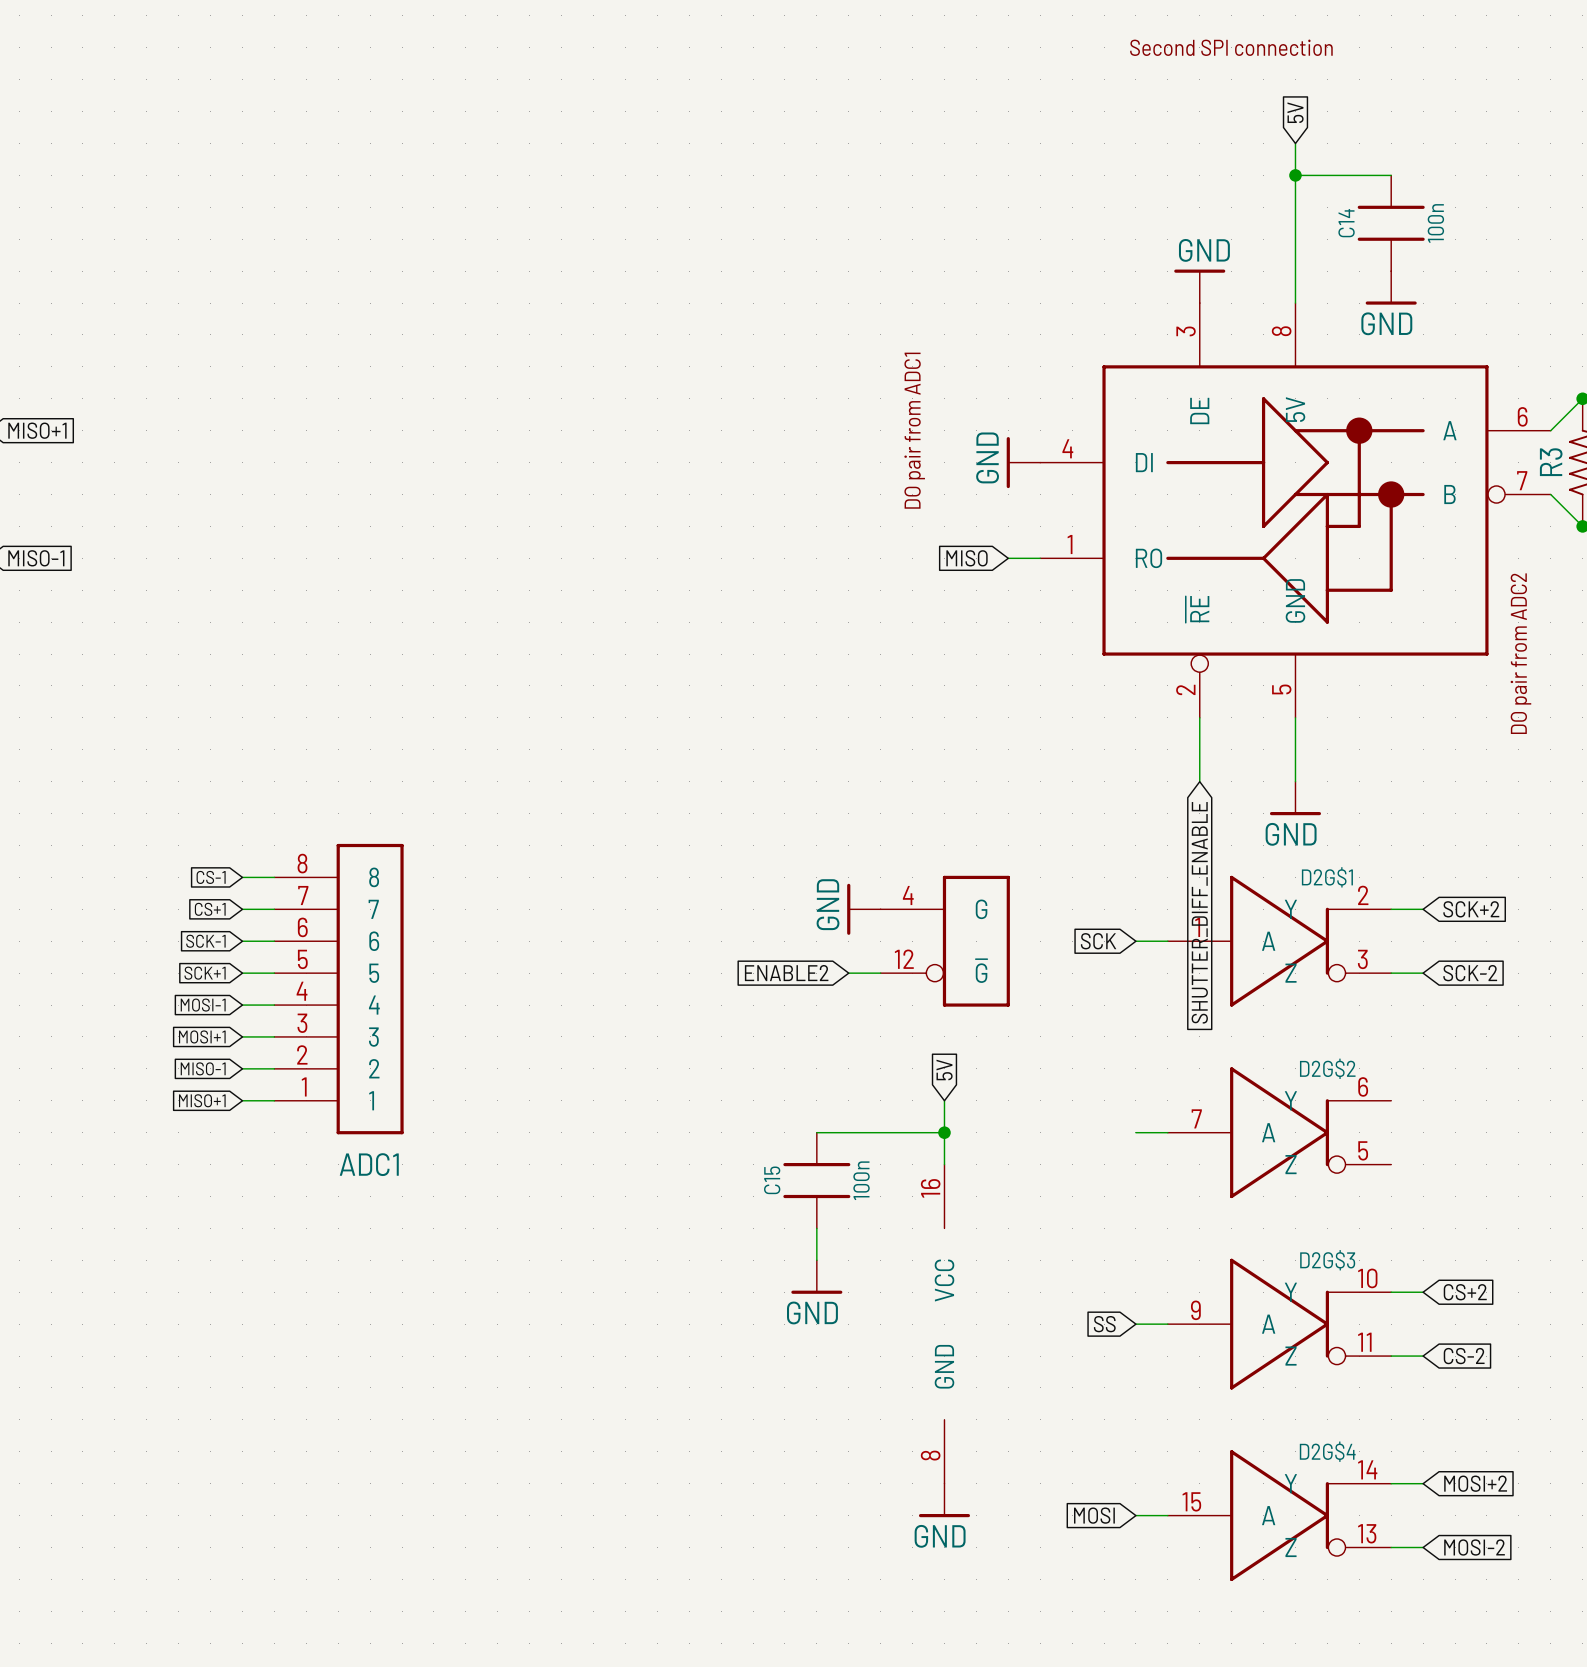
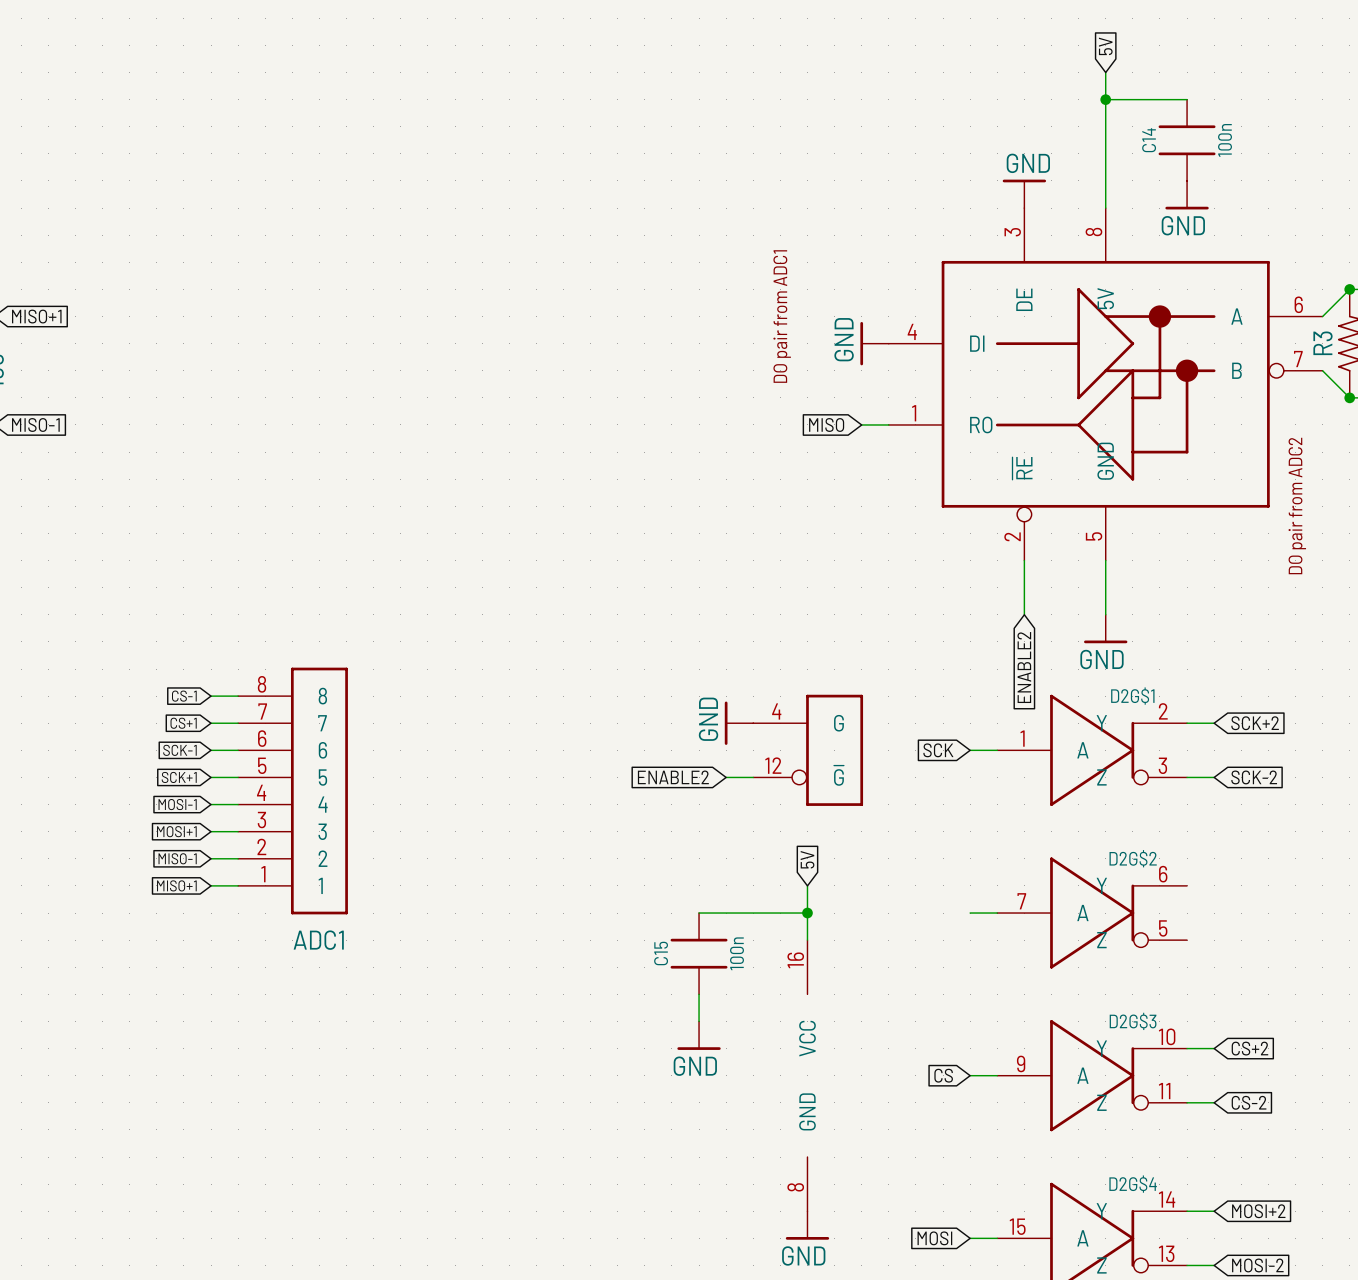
global label: SHUTTER_DIFF_ENABLE (1199, 912) -> ENABLE2 (1024, 667)
global label: SS (1104, 1324) -> CS (943, 1075)

